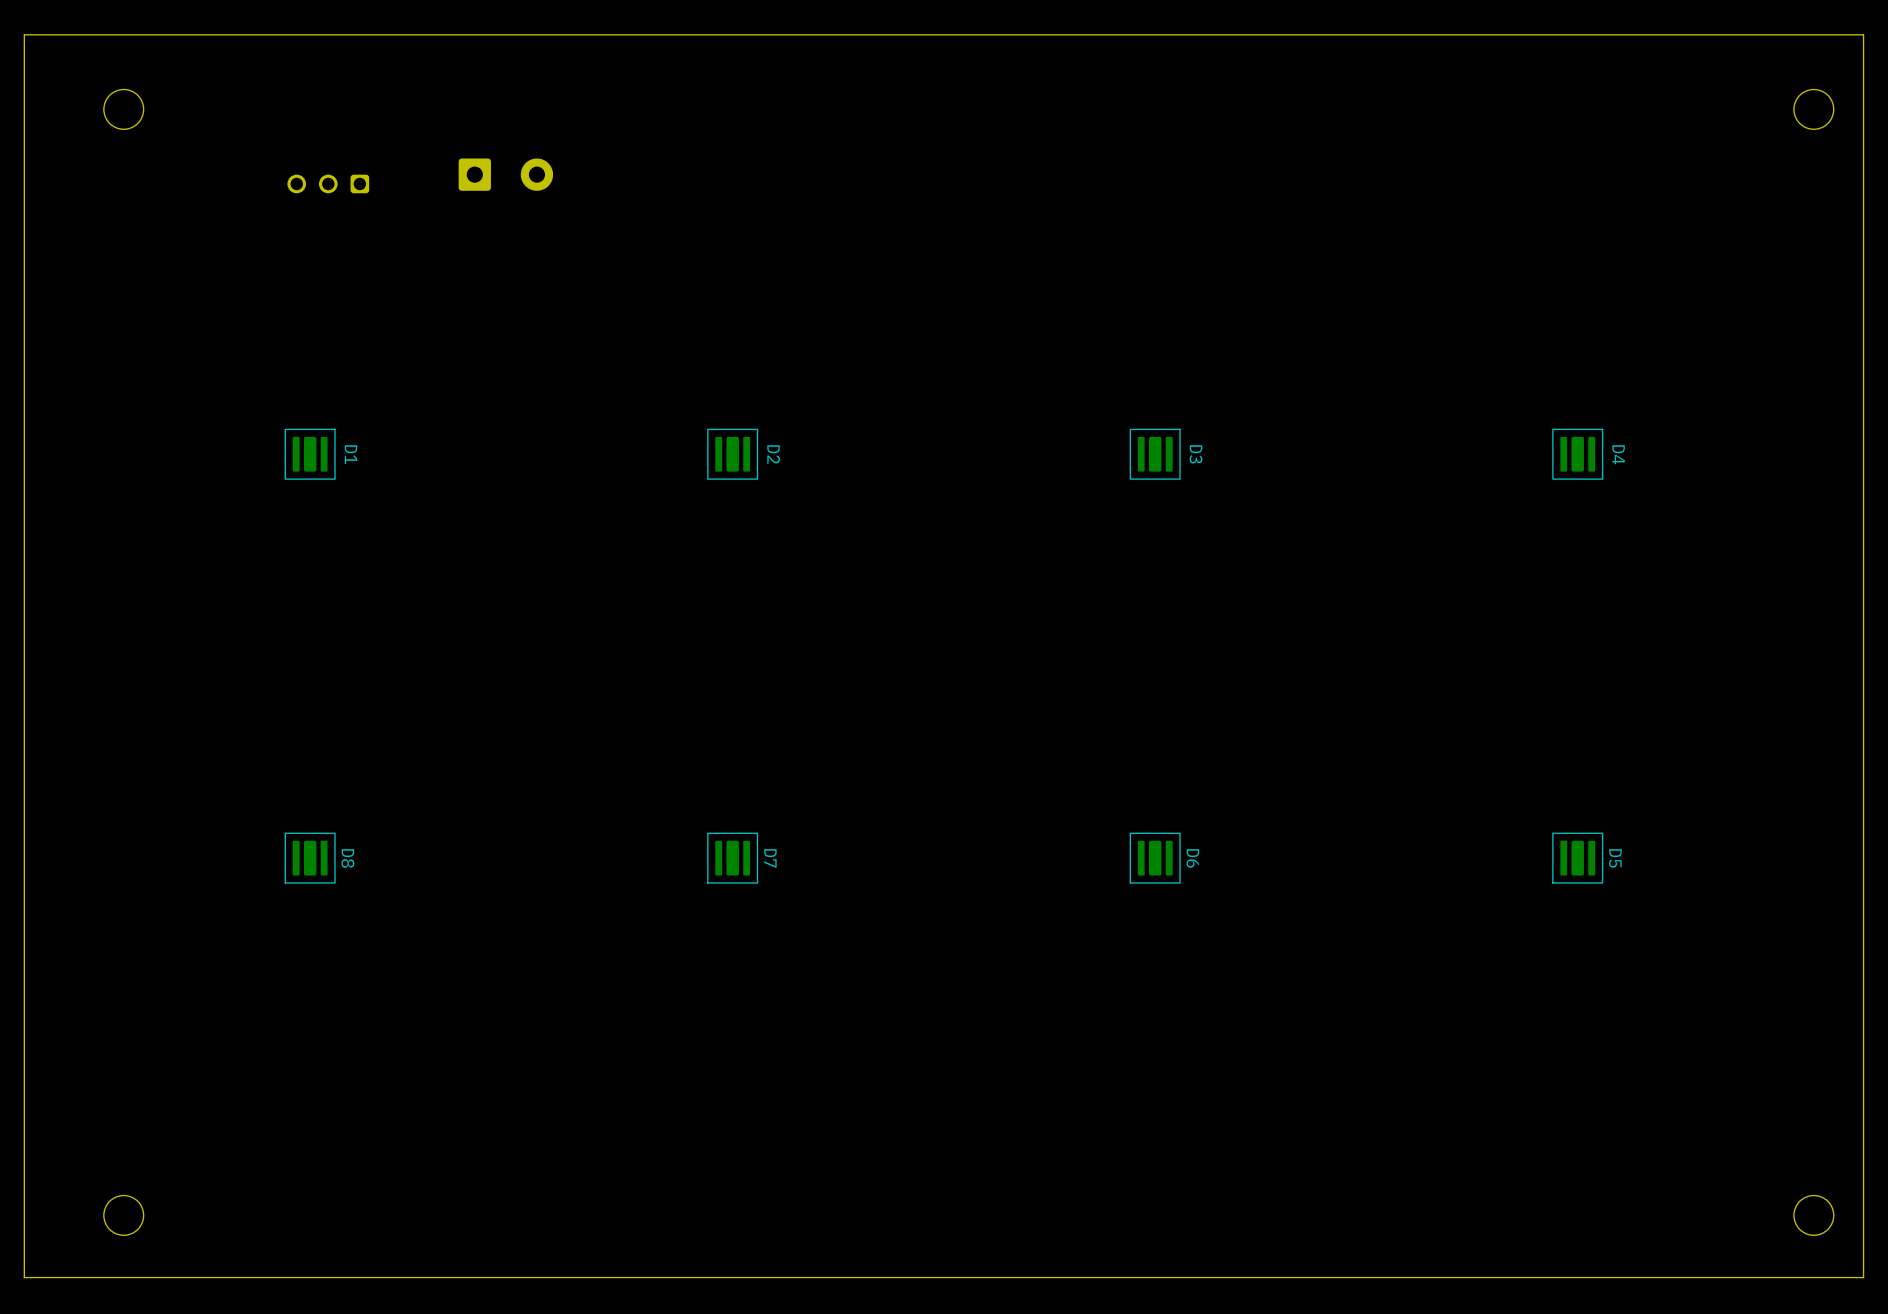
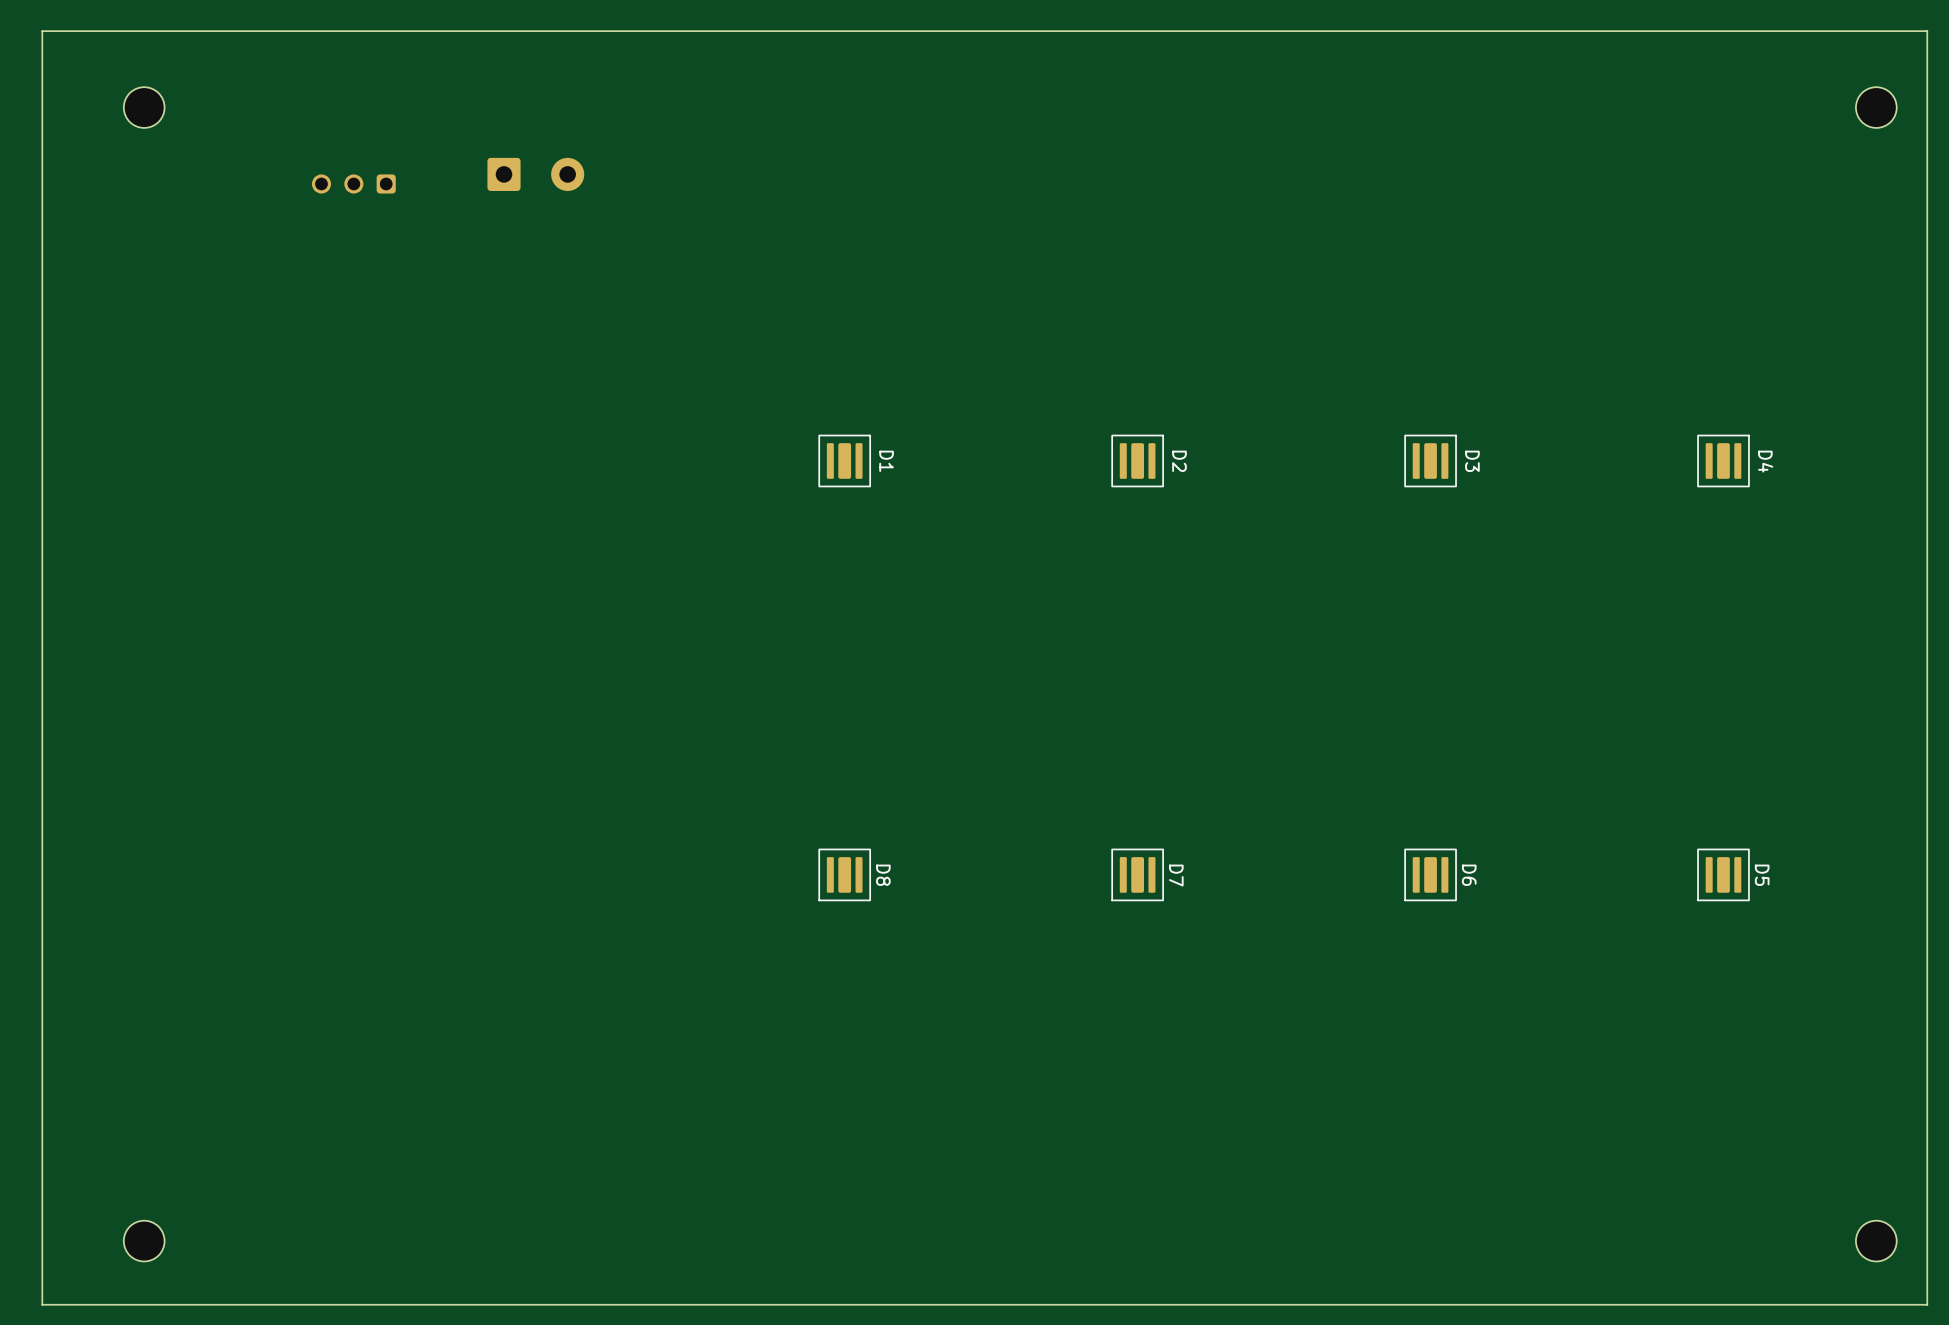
D1 position: (310, 454) -> (844, 460)
D2 position: (732, 454) -> (1137, 460)
D3 position: (1155, 454) -> (1430, 460)
D4 position: (1577, 454) -> (1723, 460)
D8 position: (310, 858) -> (844, 874)
D7 position: (732, 858) -> (1137, 874)
D6 position: (1155, 858) -> (1430, 874)
D5 position: (1577, 858) -> (1723, 874)

